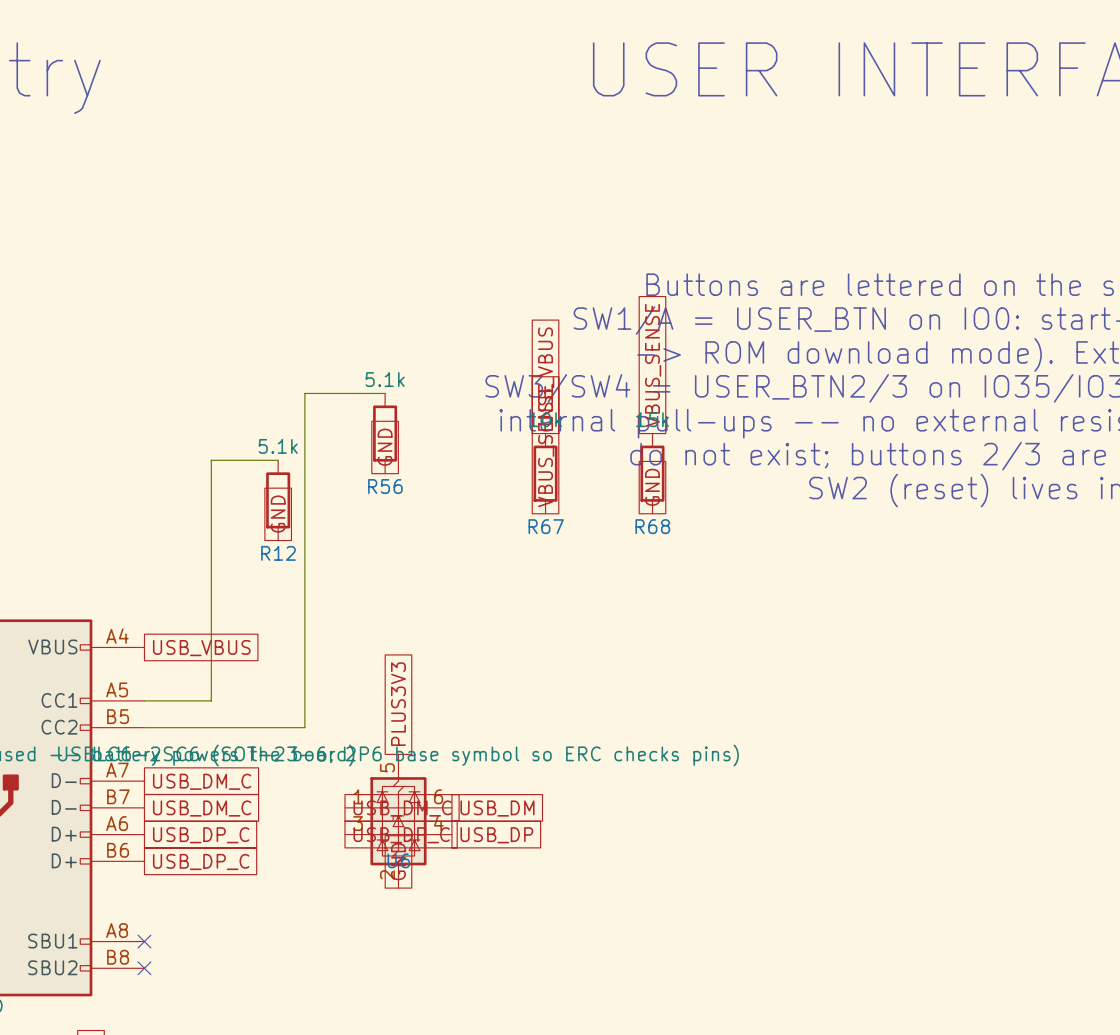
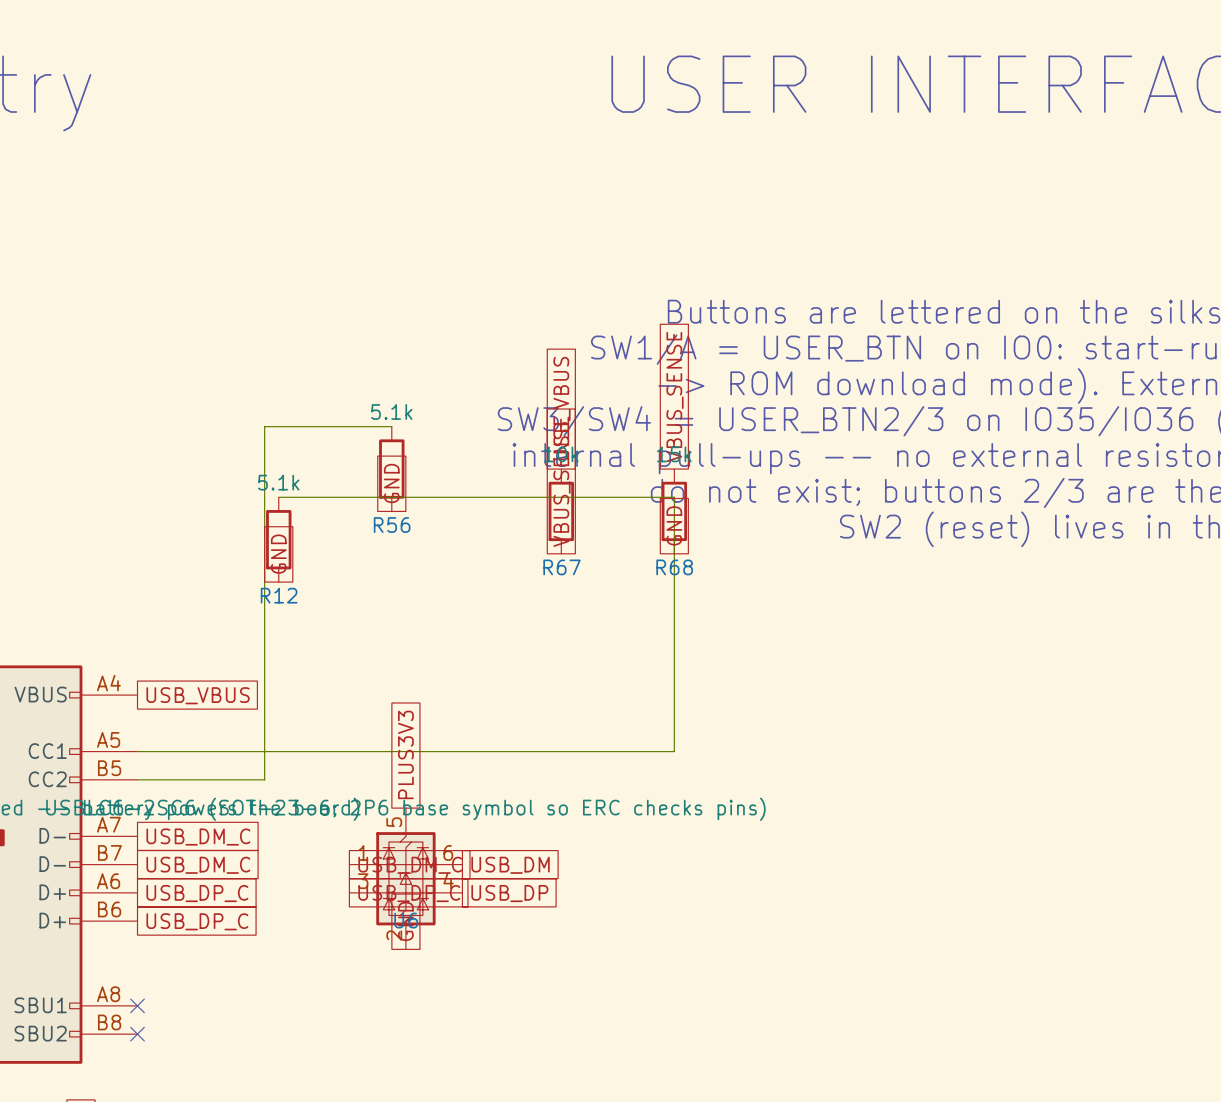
wire: (304, 393) (304, 727) (264, 727) -> (307, 426) (264, 426) (264, 779)
wire: (278, 460) (211, 460) (211, 700) -> (278, 497) (674, 497) (674, 751) (208, 751)

